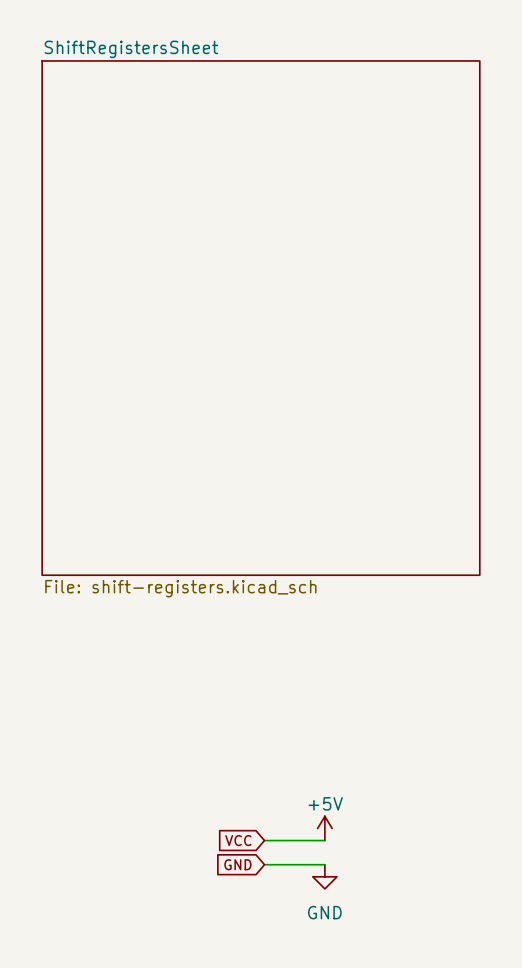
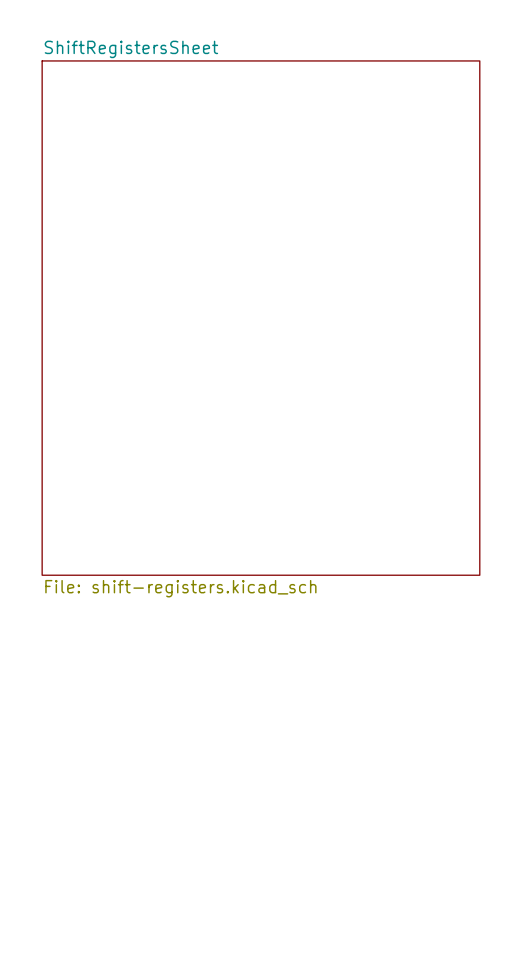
power symbol: +5V (324, 828) -> none
global label: VCC (238, 840) -> none
wire: (264, 840) (324, 840) -> none
global label: GND (237, 864) -> none
wire: (264, 864) (324, 864) -> none
power symbol: GND (324, 876) -> none

